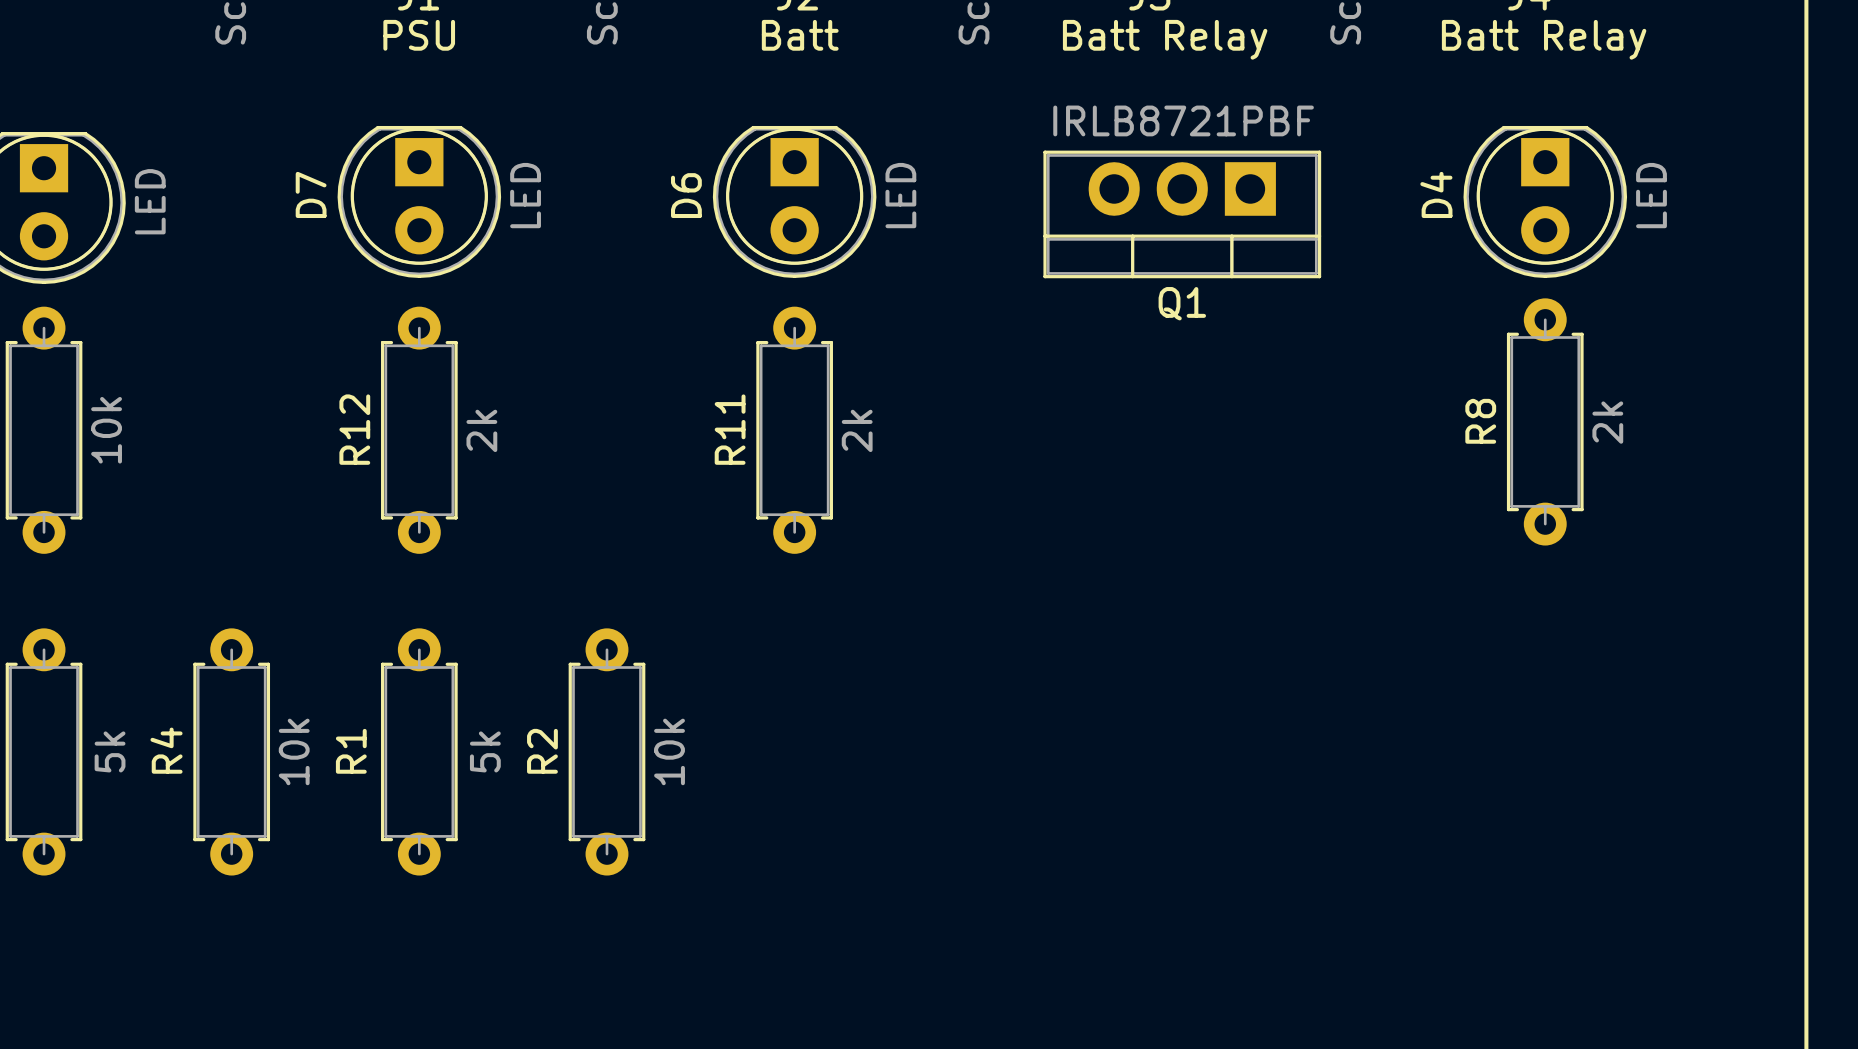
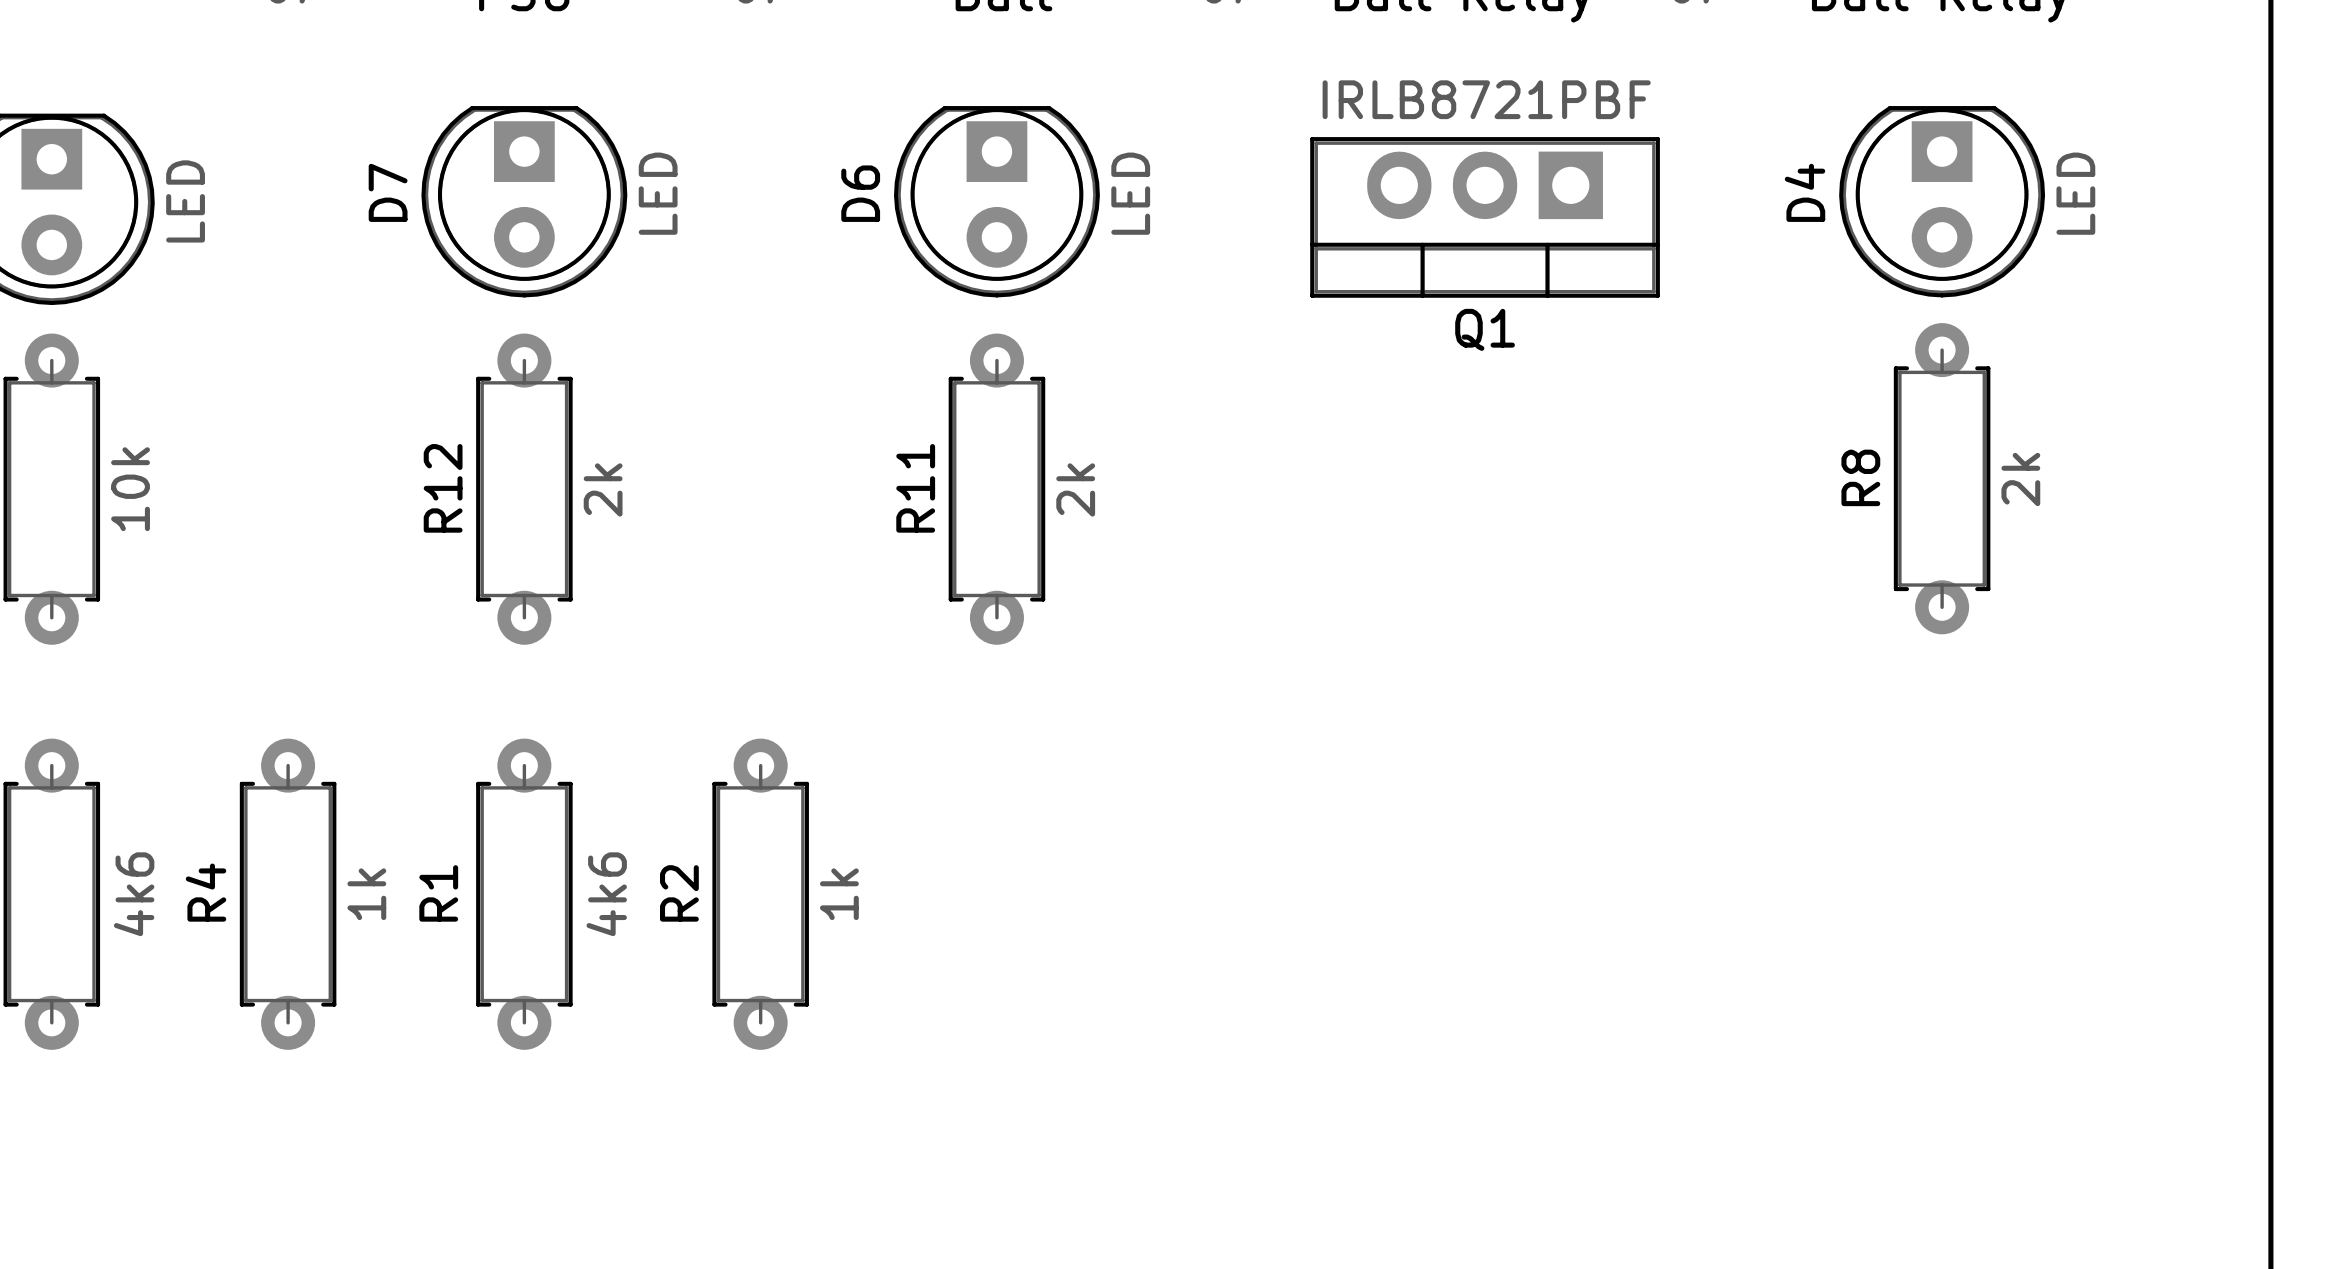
part value: 5k (110, 751) -> 4k6 (134, 894)
R4 value: 10k (294, 751) -> 1k (366, 894)
R1 value: 5k (485, 751) -> 4k6 (606, 894)
R2 value: 10k (669, 751) -> 1k (839, 894)

